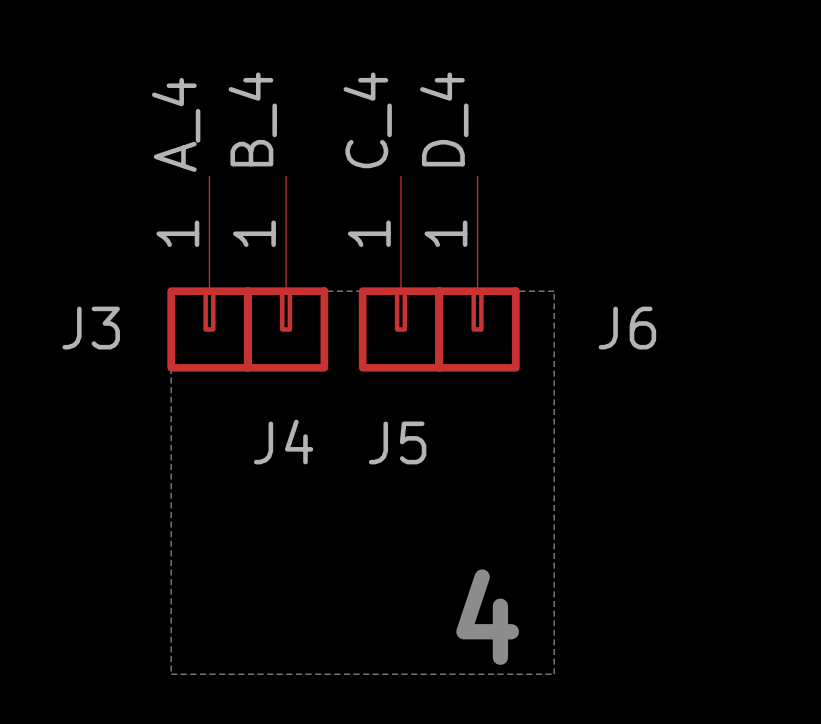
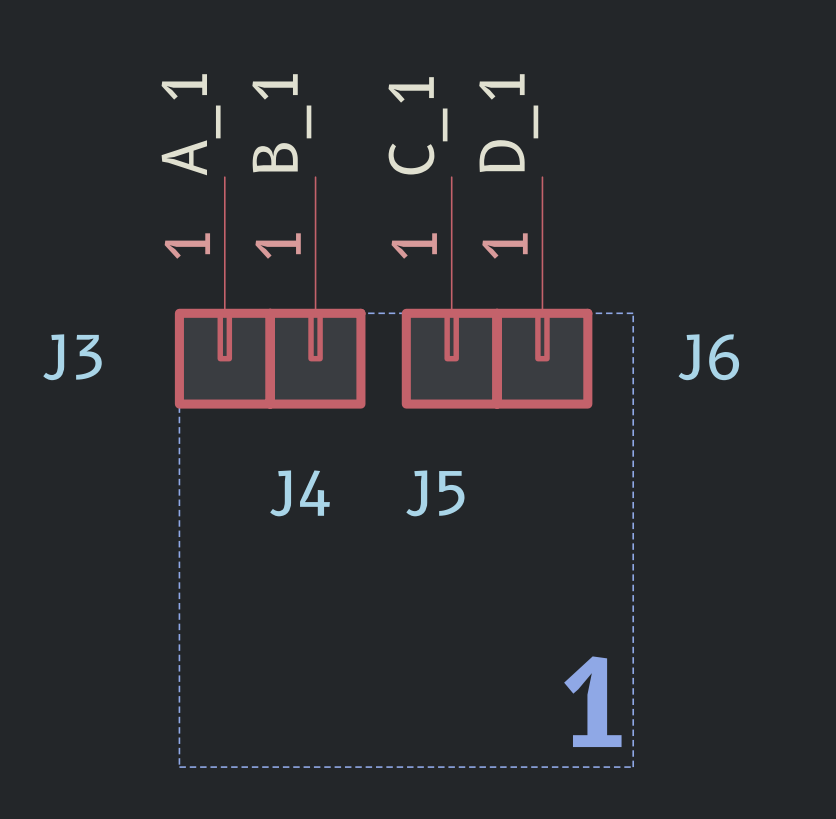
label: B_4 (252, 119) -> B_1 (281, 123)
label: D_4 (444, 119) -> D_1 (508, 123)
label: C_4 (367, 120) -> C_1 (417, 125)
label: A_4 (176, 124) -> A_1 (191, 124)
text: 4 (487, 617) -> none
text: none -> 1 (592, 701)

